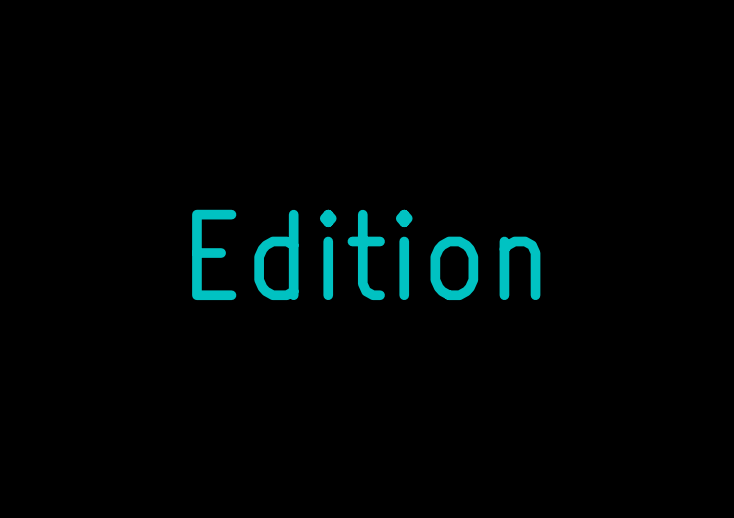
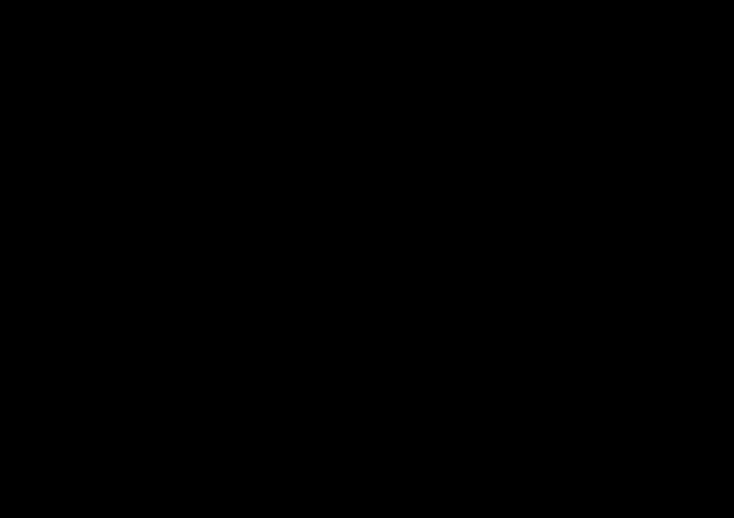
text: Edition (366, 254) -> none

